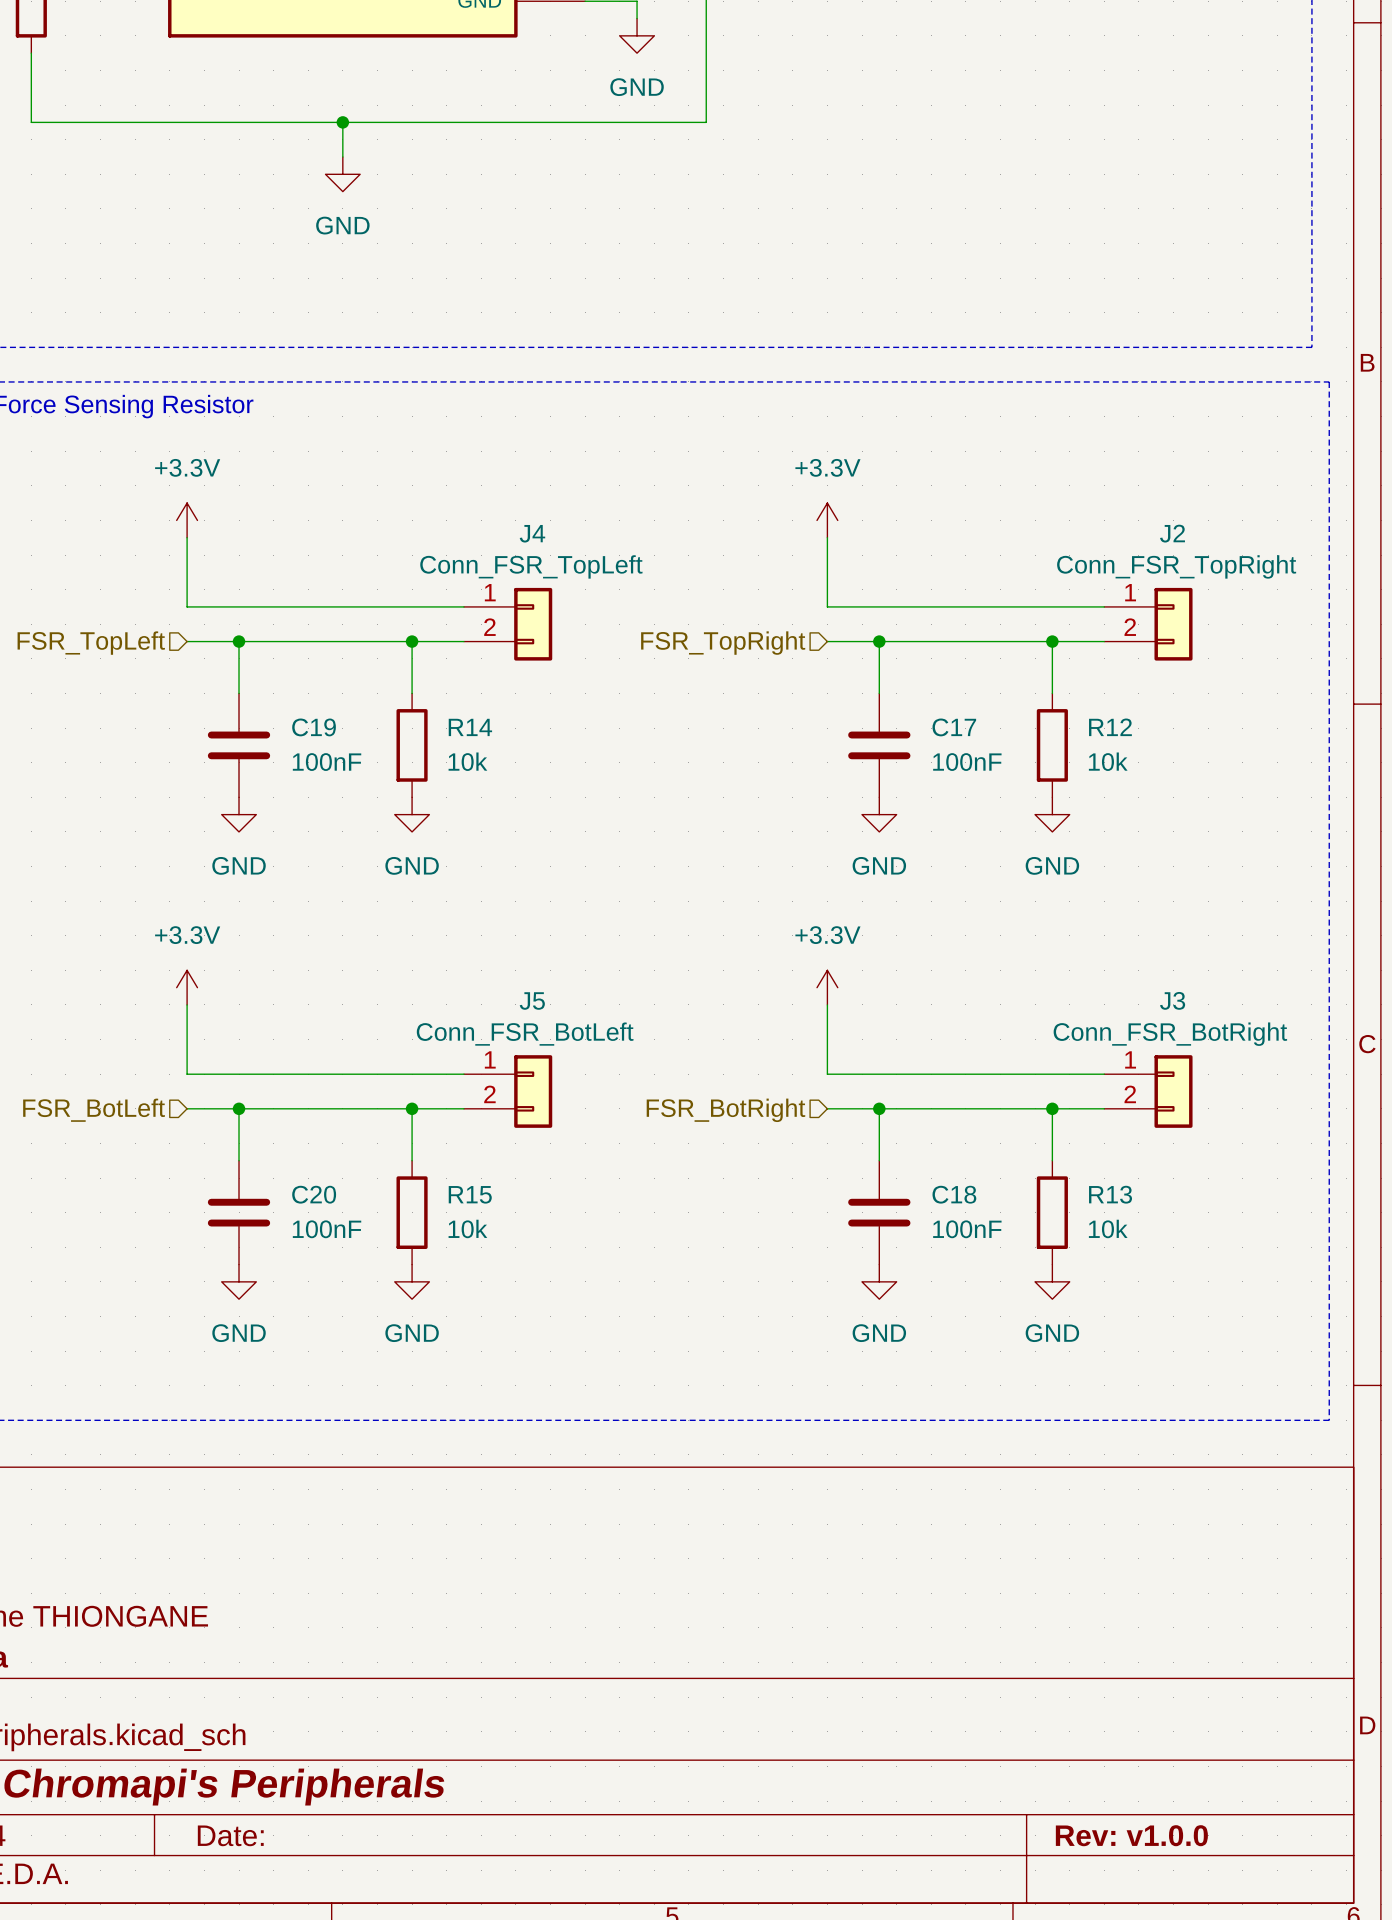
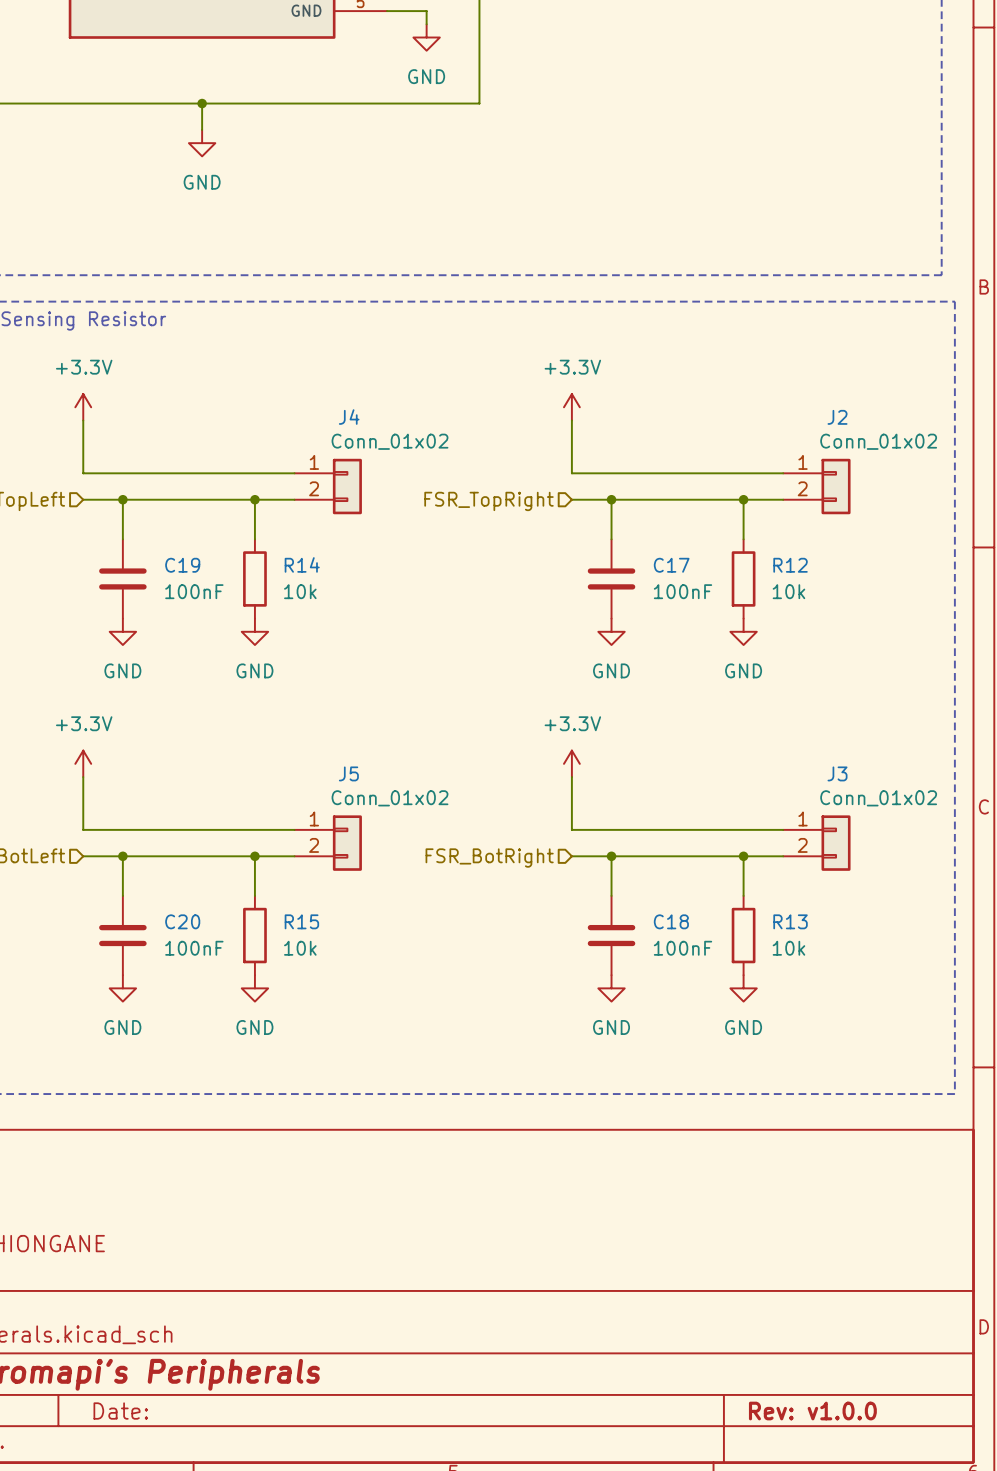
J4 value: Conn_FSR_TopLeft (531, 566) -> Conn_01x02 (390, 441)
J2 value: Conn_FSR_TopRight (1176, 566) -> Conn_01x02 (878, 441)
J5 value: Conn_FSR_BotLeft (525, 1034) -> Conn_01x02 (390, 798)
J3 value: Conn_FSR_BotRight (1170, 1034) -> Conn_01x02 (878, 798)

